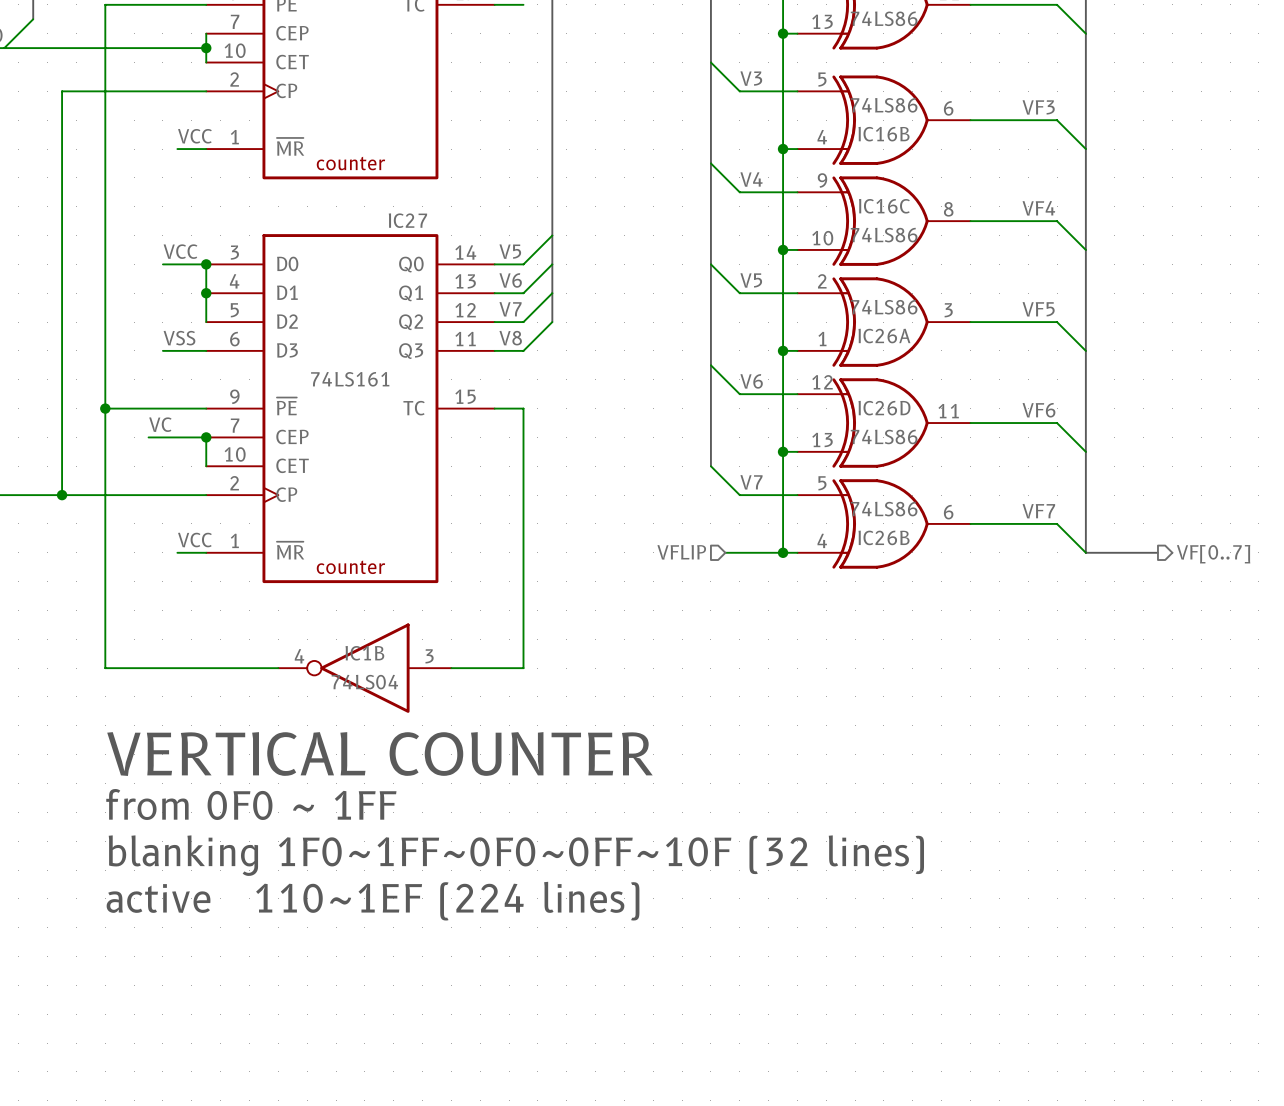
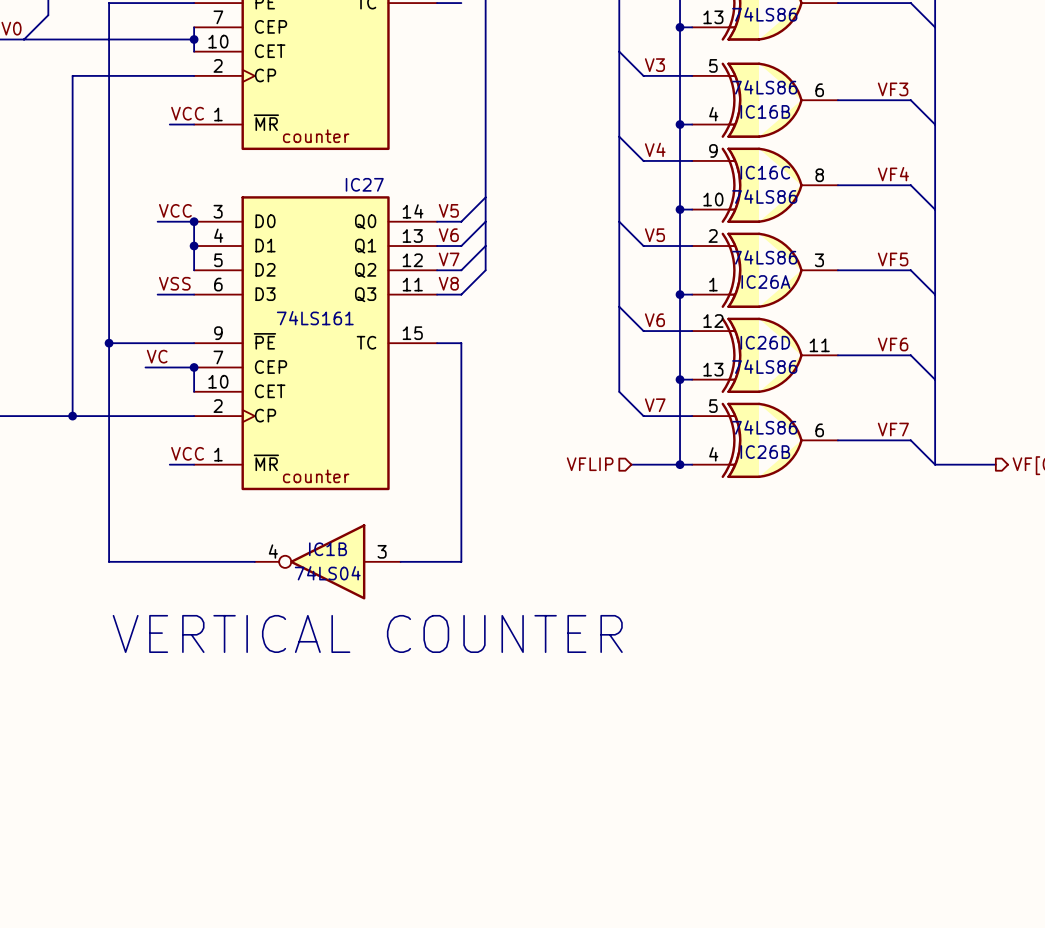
text: from 0F0 ~ 1FF (251, 804) -> none
text: blanking 1F0~1FF~0F0~0FF~10F (32 lines) (516, 855) -> none
text: active 110~1EF (224 lines) (373, 901) -> none

